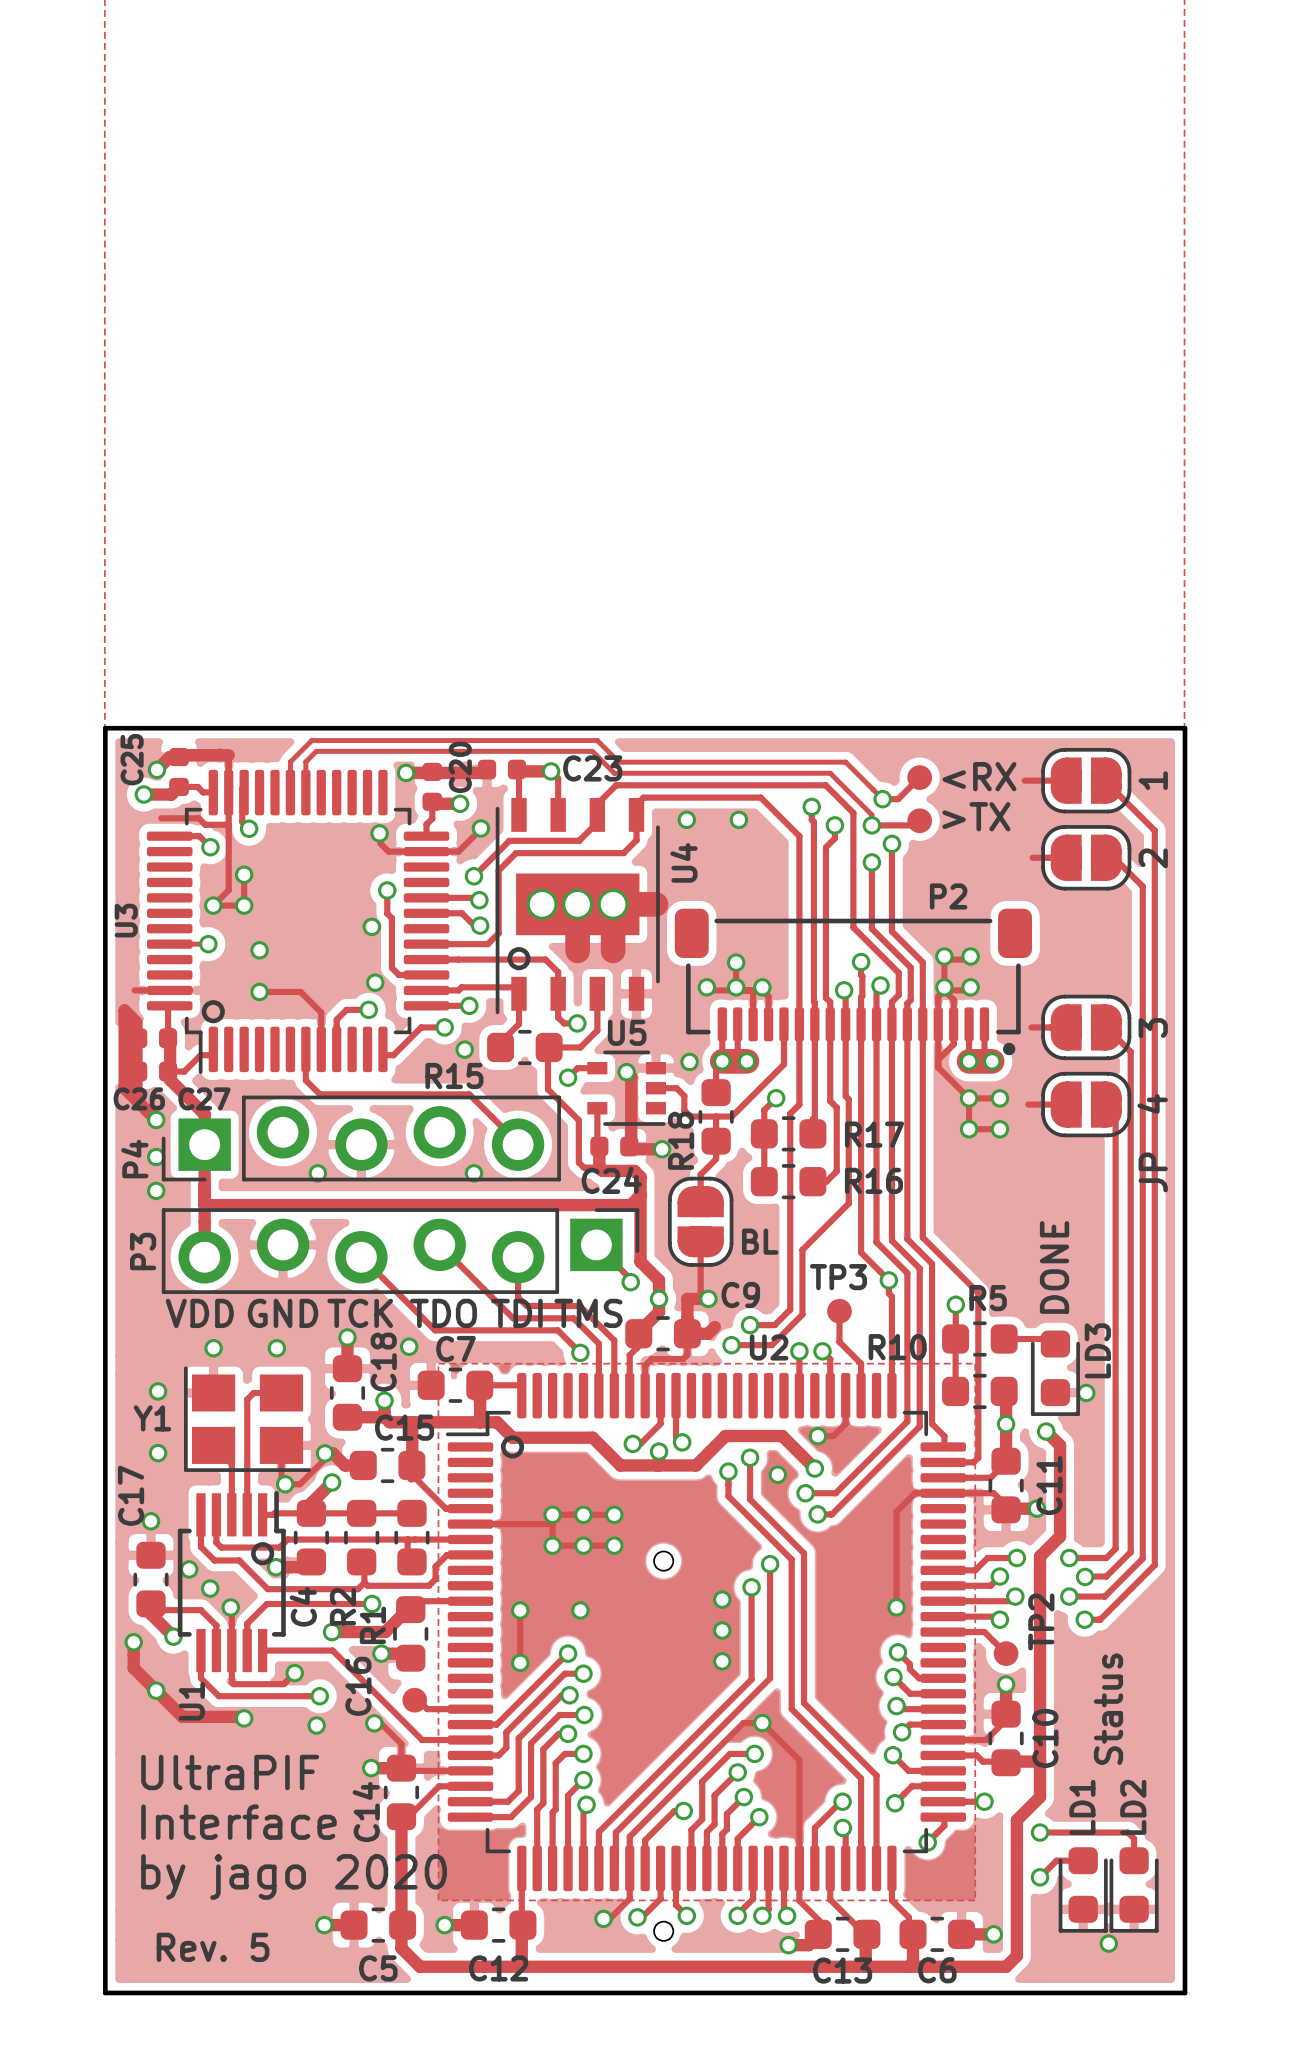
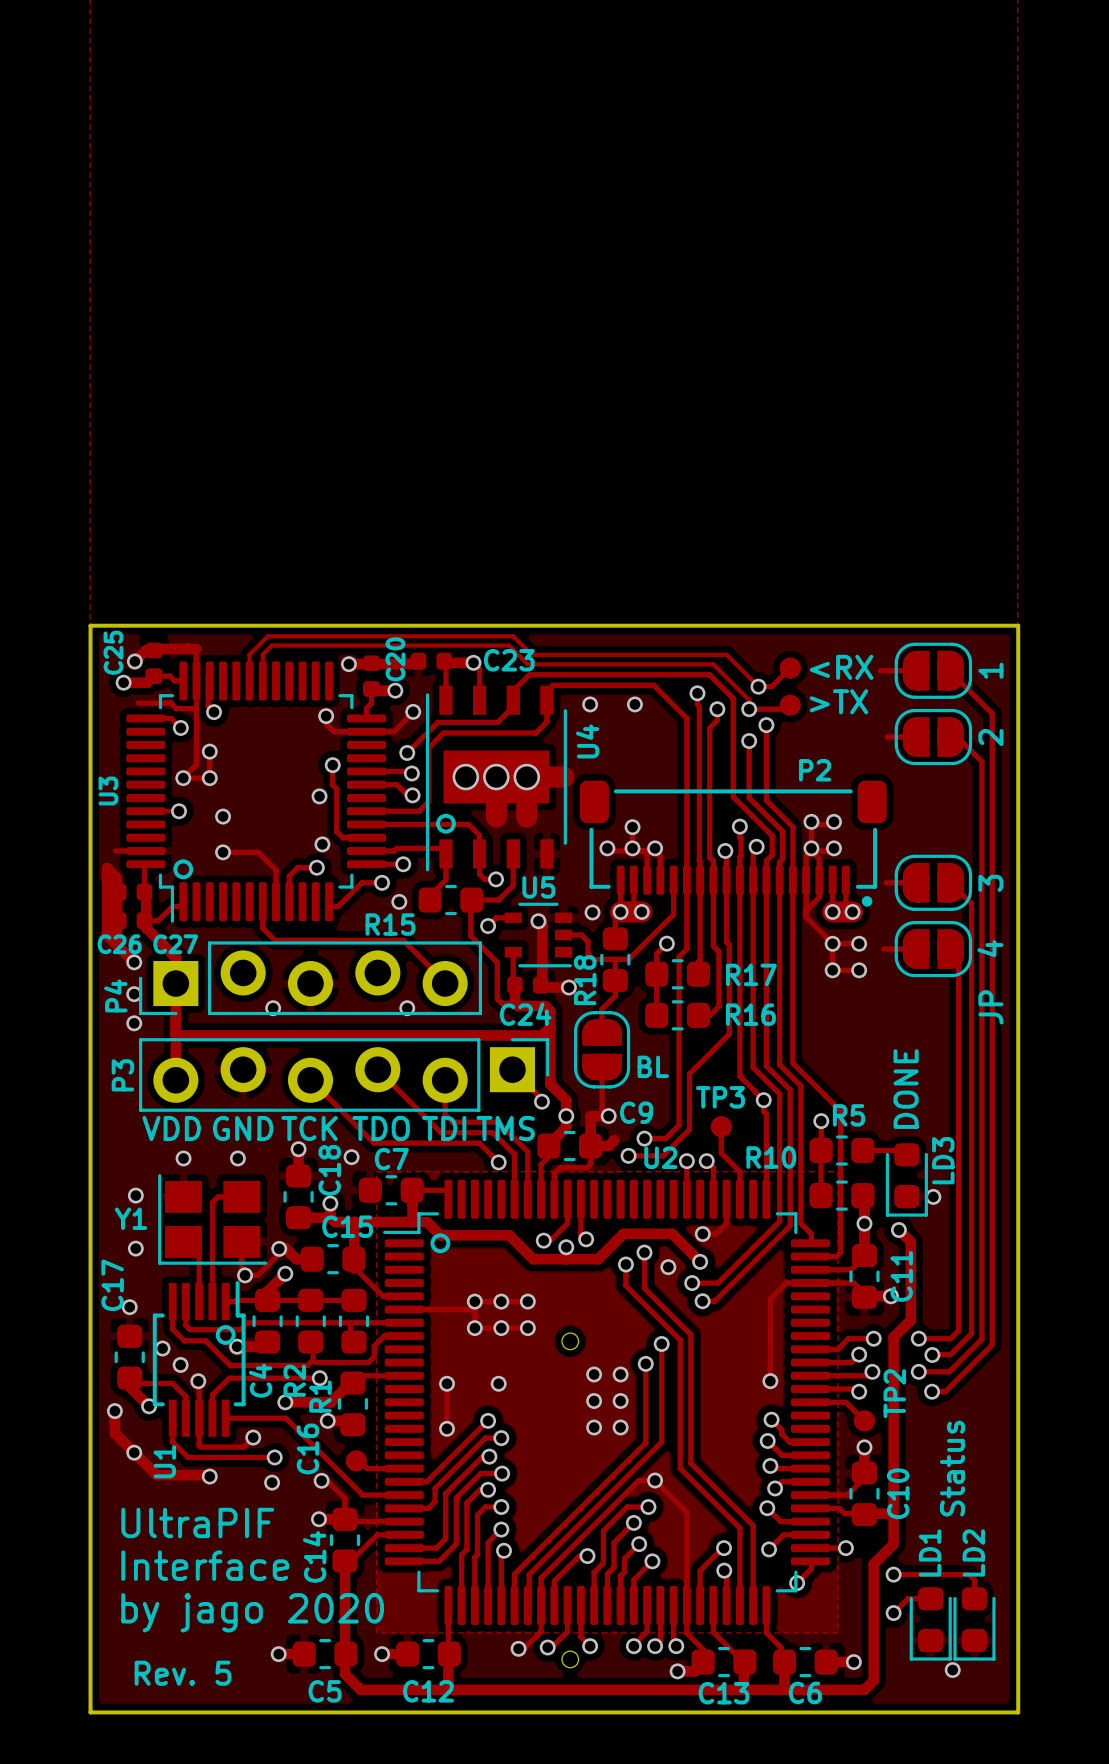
via: none -> (594, 1374)
via: none -> (594, 1401)
via: none -> (594, 1427)

